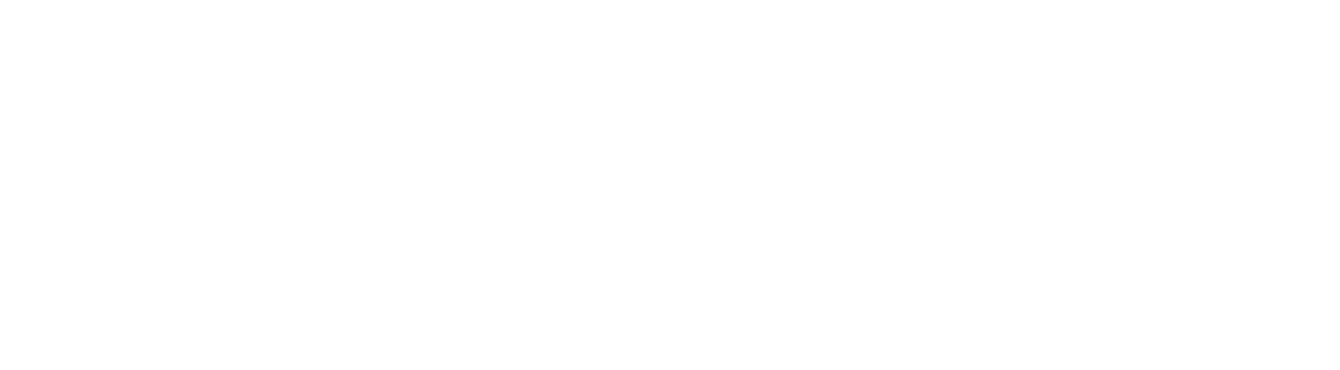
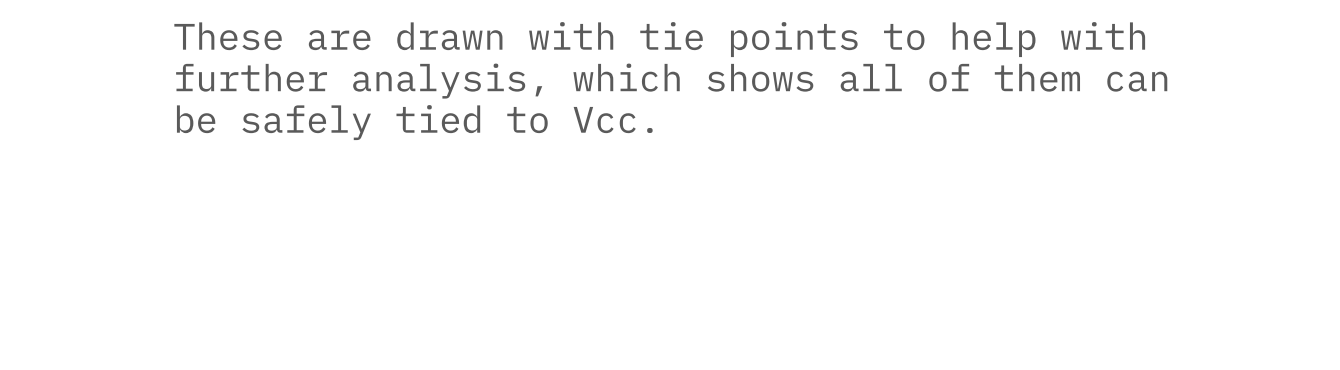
text: none -> These are drawn with tie points to help with (659, 39)
text: none -> further analysis, which shows all of them can (671, 81)
text: none -> be safely tied to Vcc. (414, 122)

